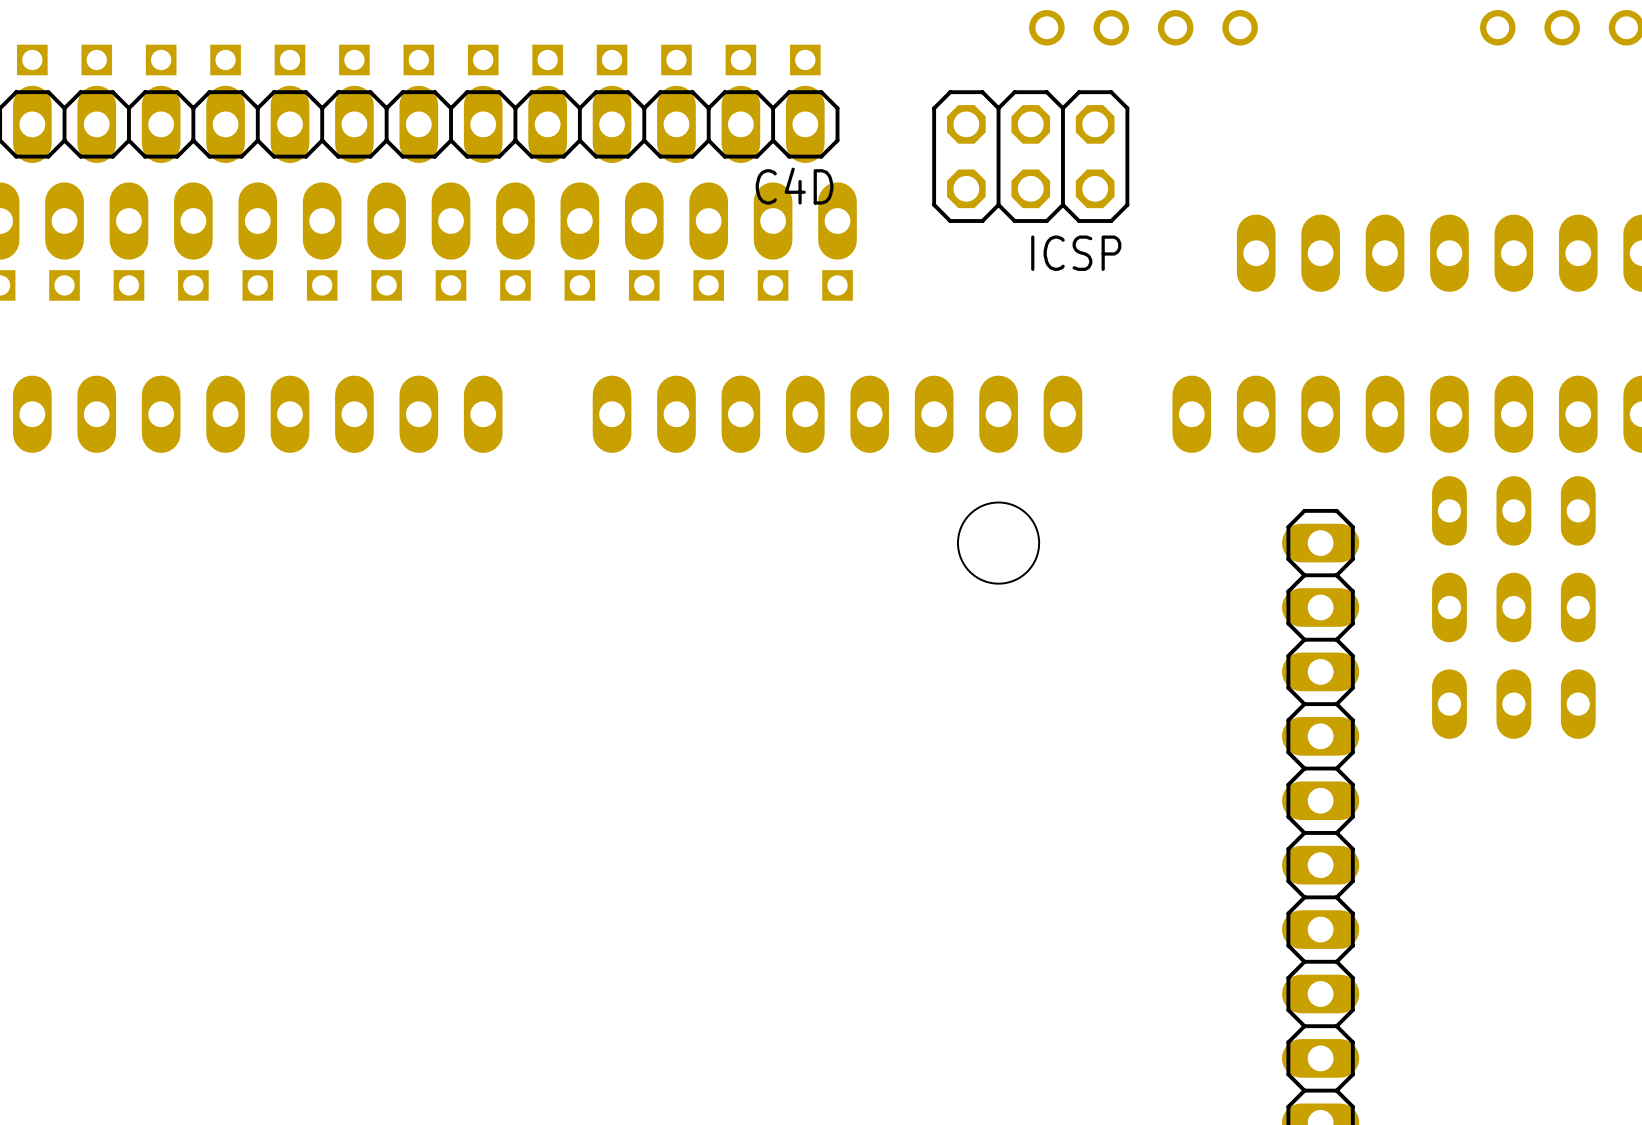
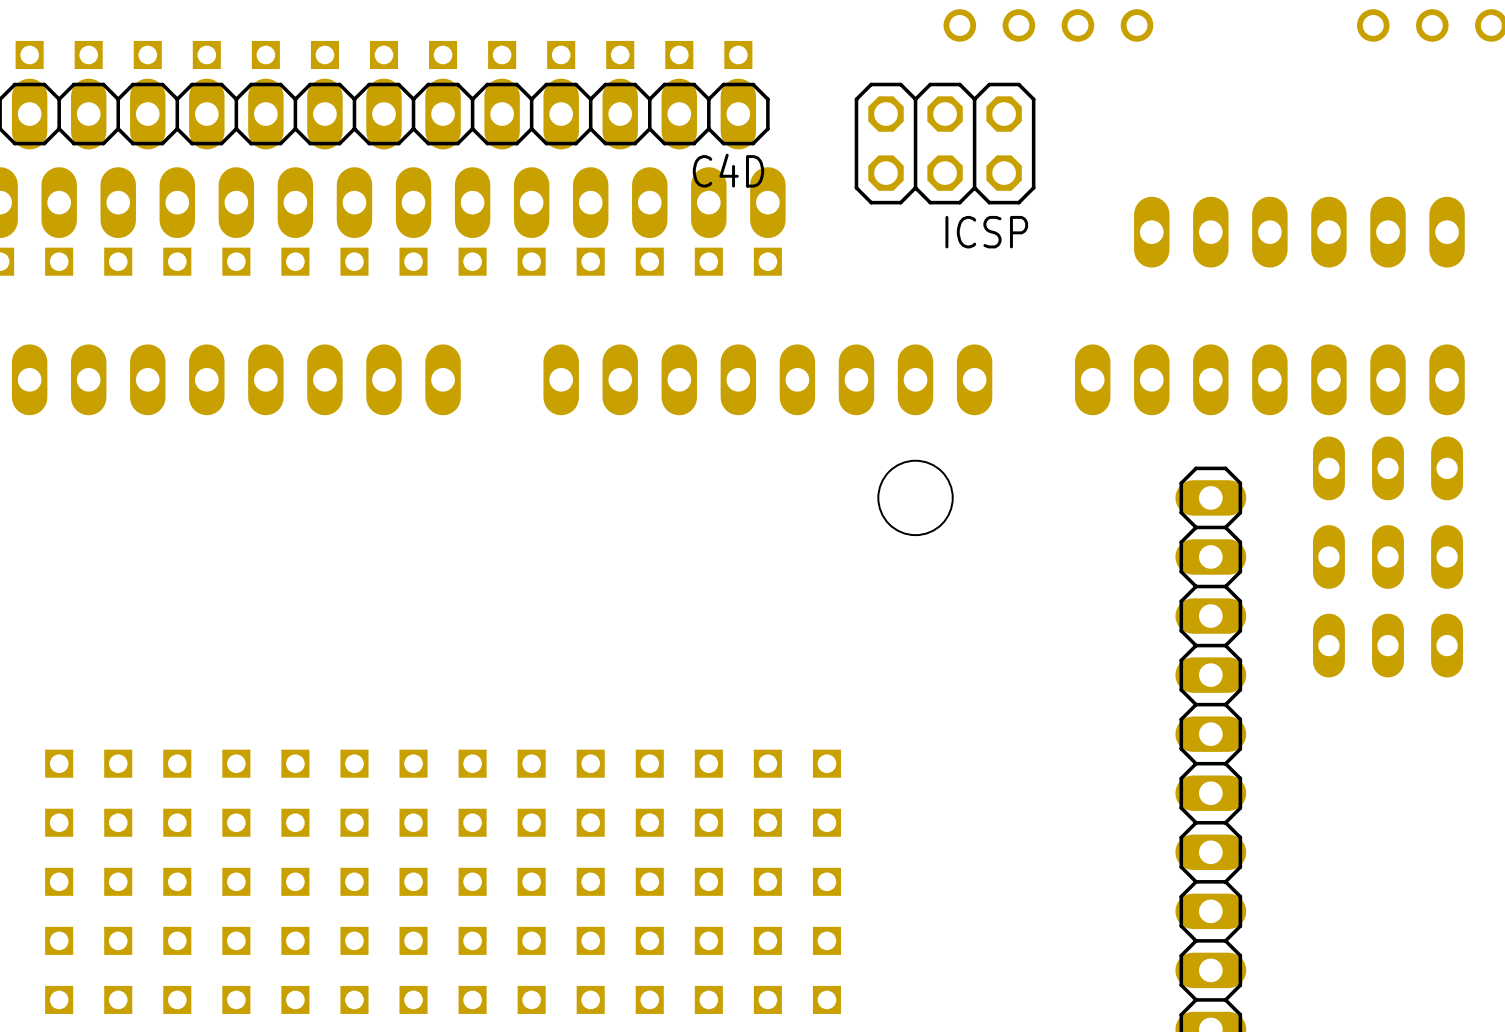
part: none -> (206, 763)
part: none -> (620, 763)
part: none -> (265, 822)
part: none -> (679, 822)
part: none -> (265, 881)
part: none -> (679, 881)
part: none -> (265, 940)
part: none -> (679, 940)
part: none -> (206, 999)
part: none -> (620, 999)

